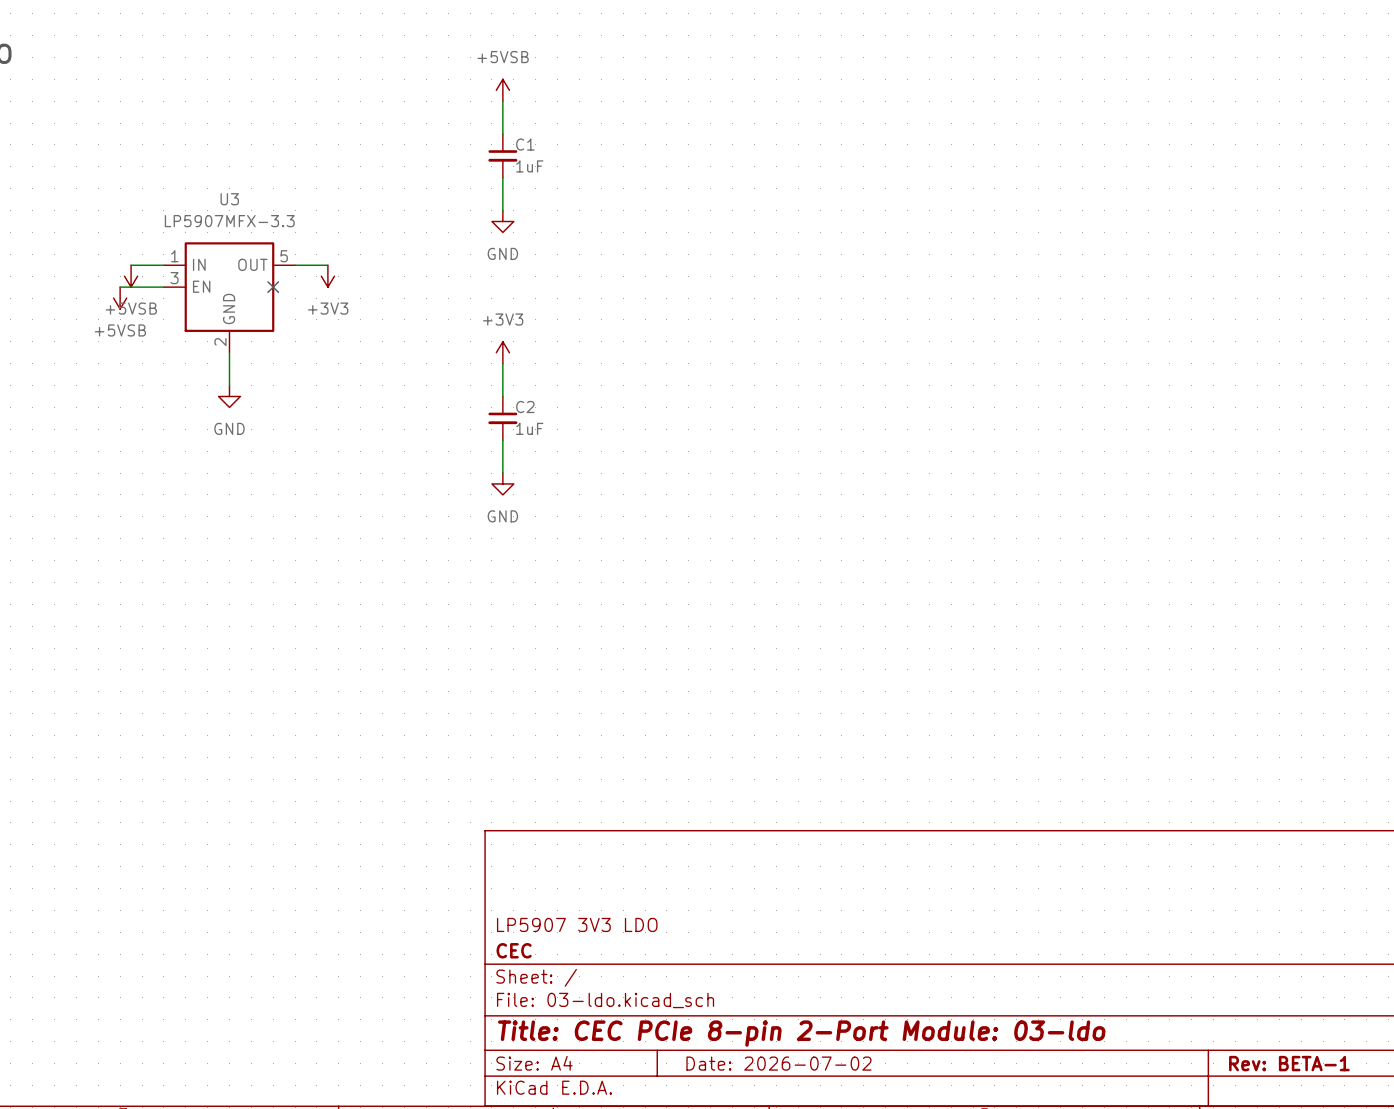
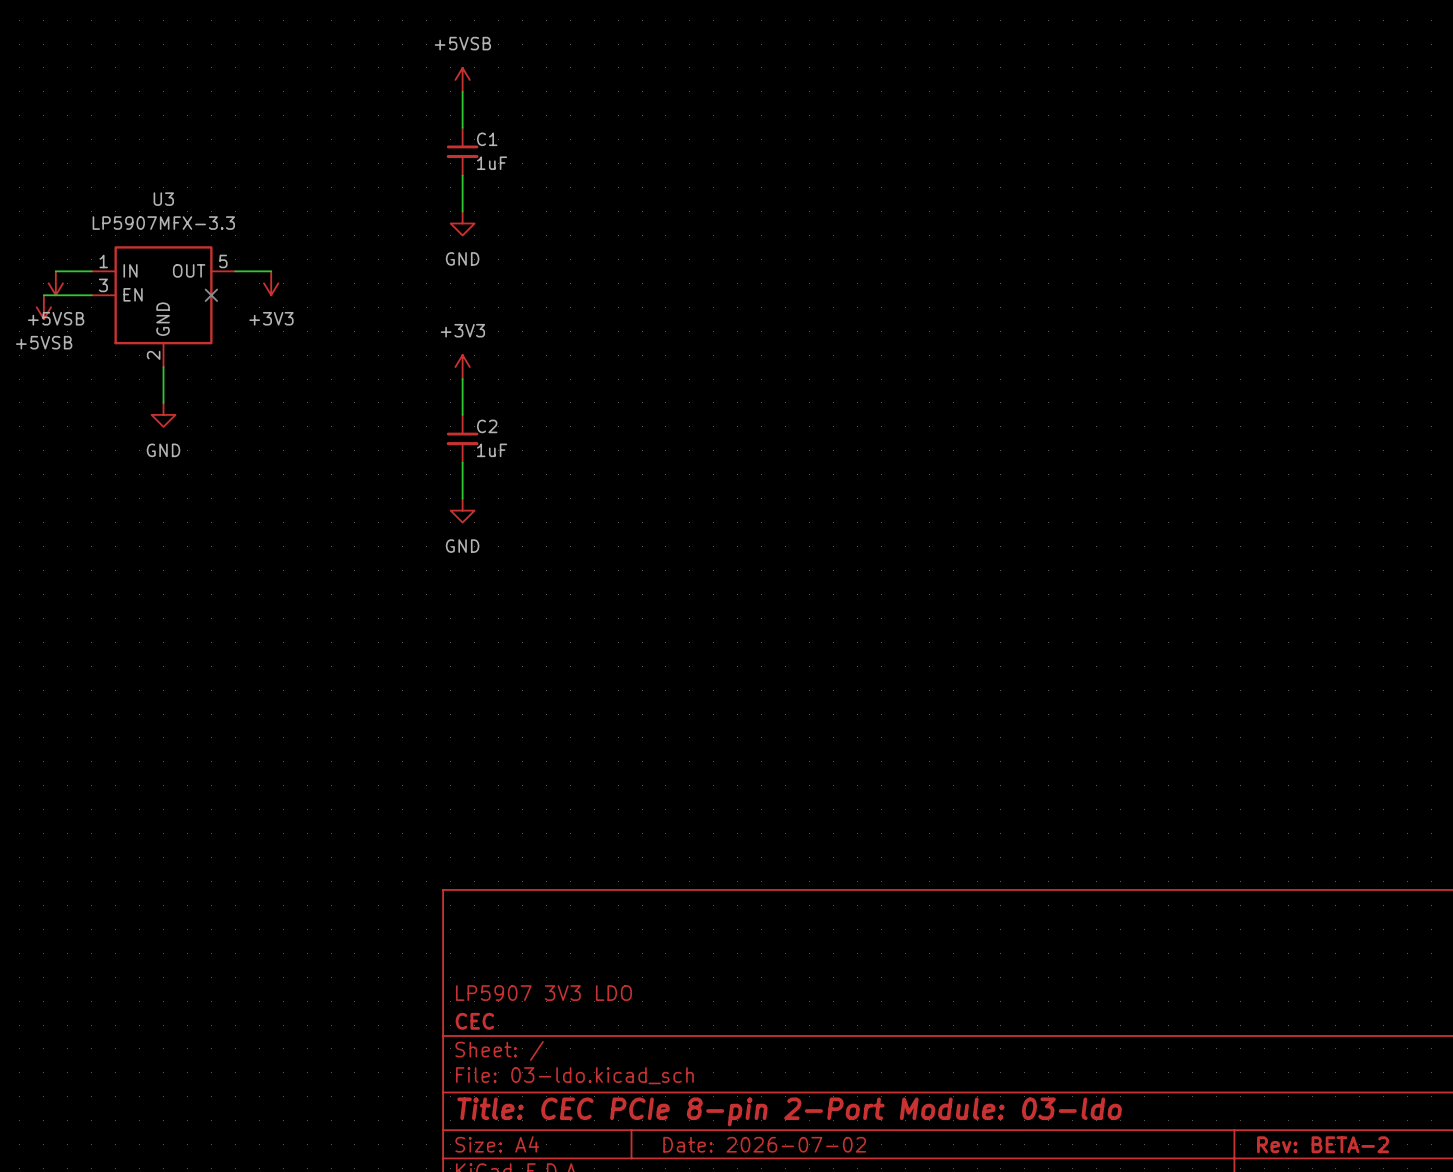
title block: Rev: BETA-1 (1289, 1063) -> Rev: BETA-2 (1323, 1144)

